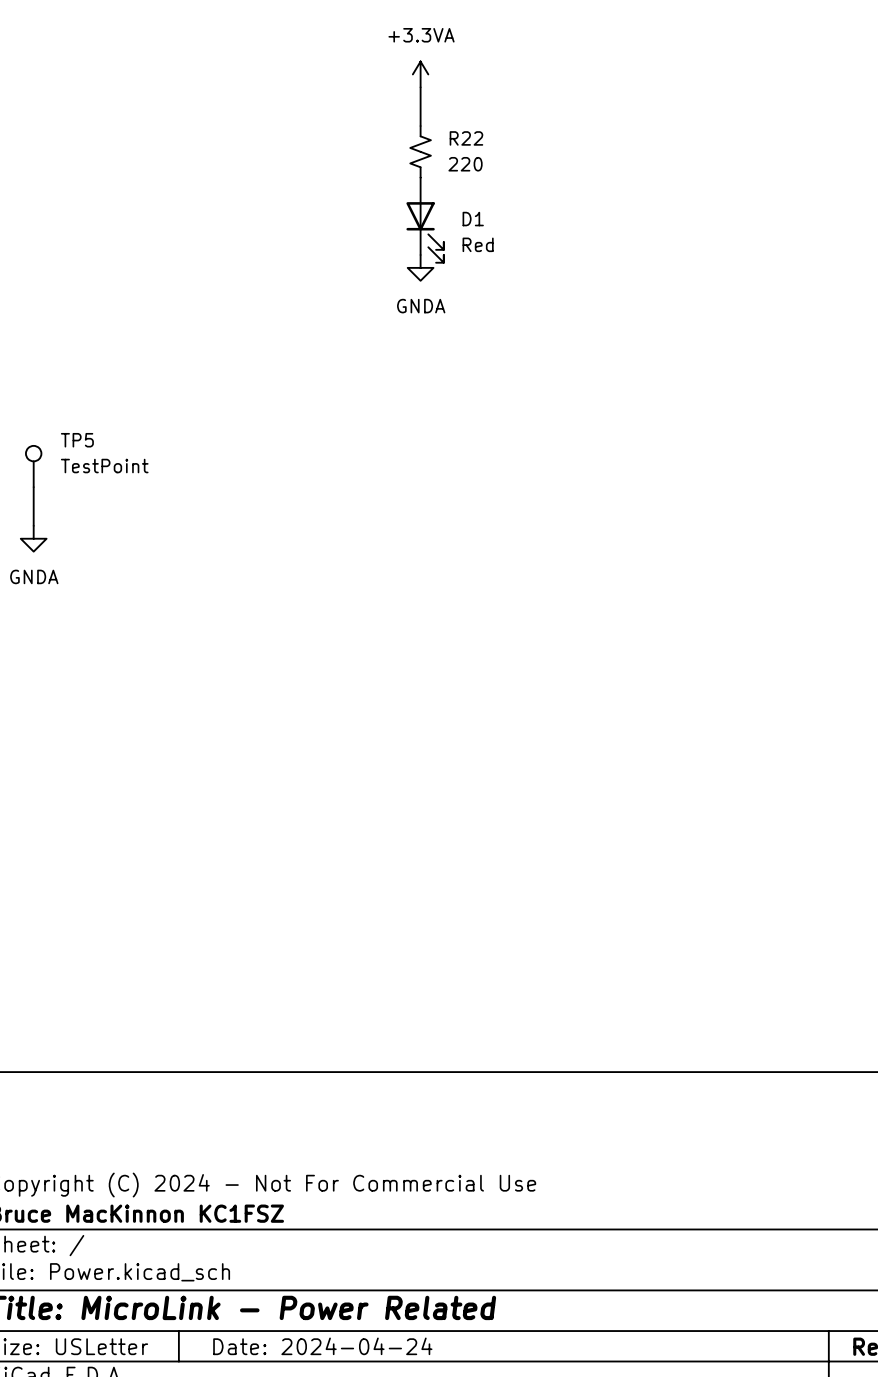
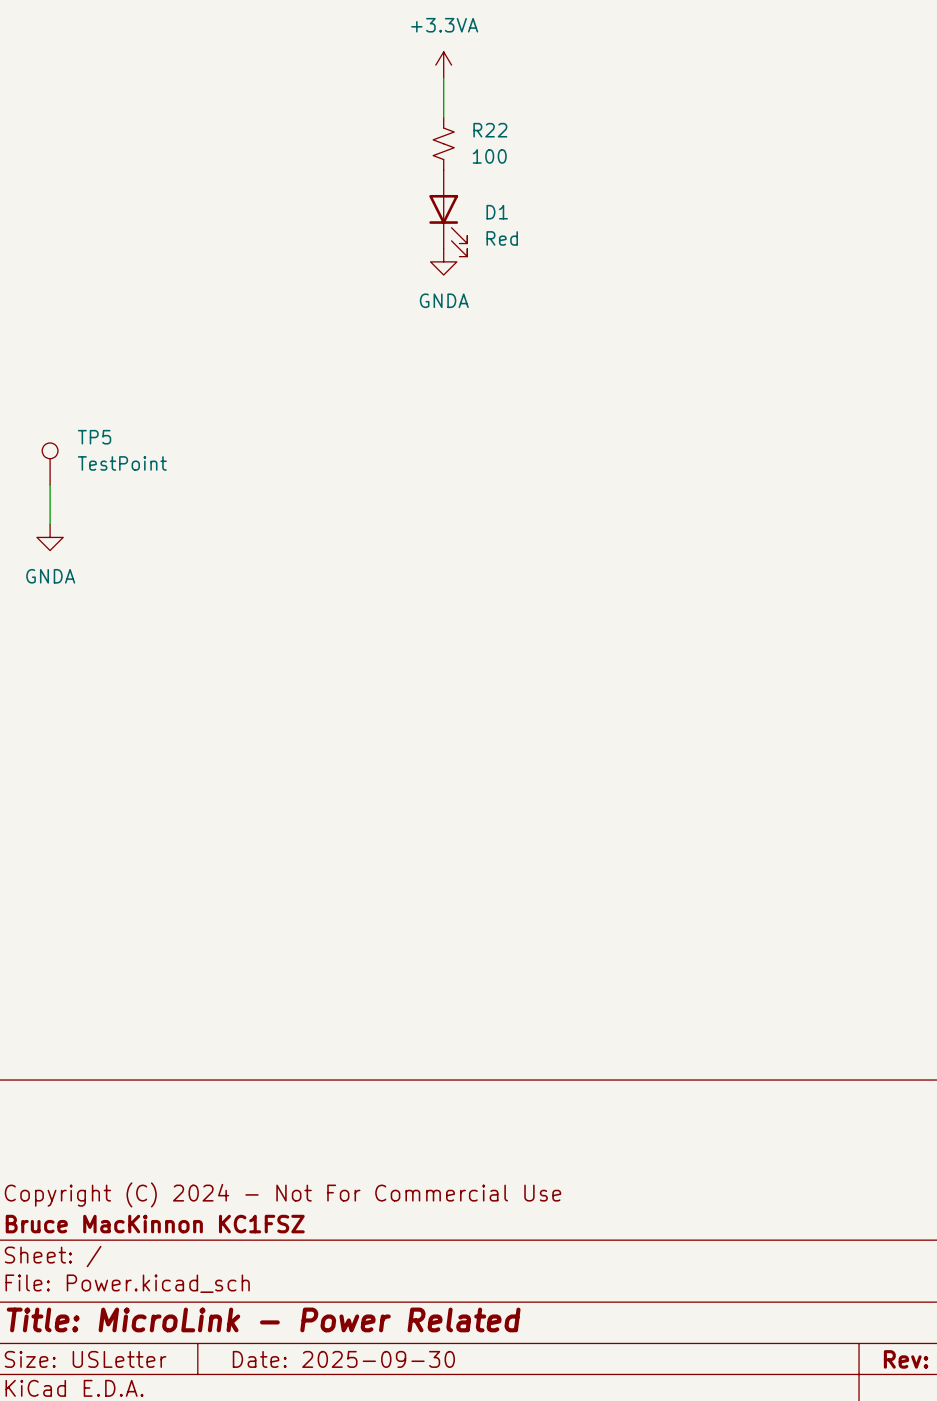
R22 value: 220 (465, 164) -> 100 (489, 156)
title block: Date: 2024-04-24 (322, 1346) -> Date: 2025-09-30 (343, 1359)

